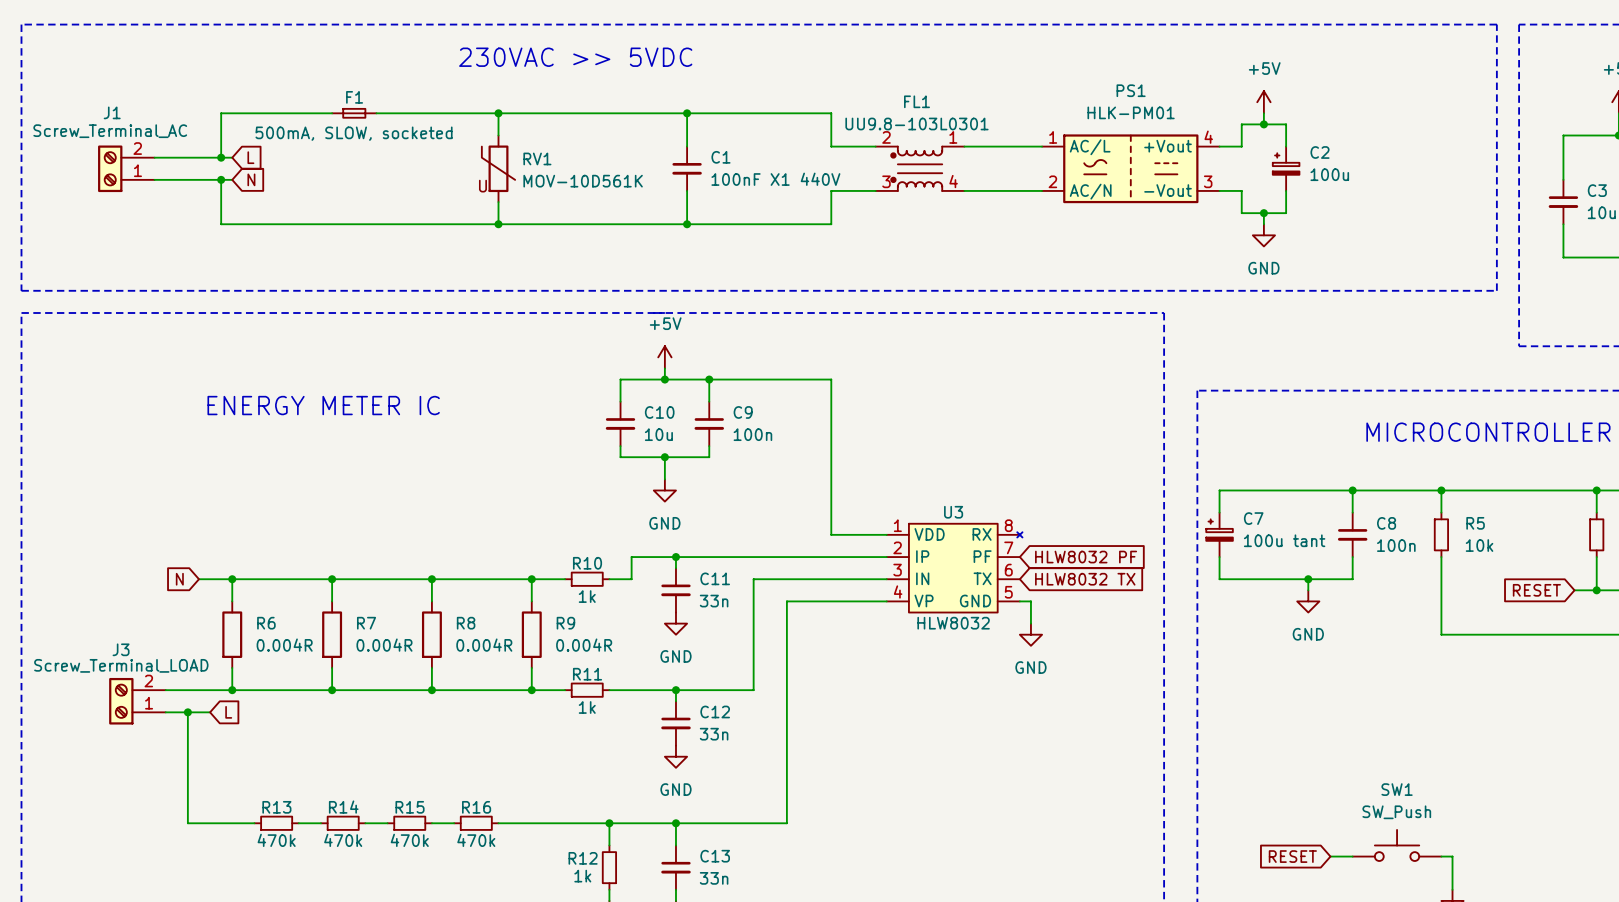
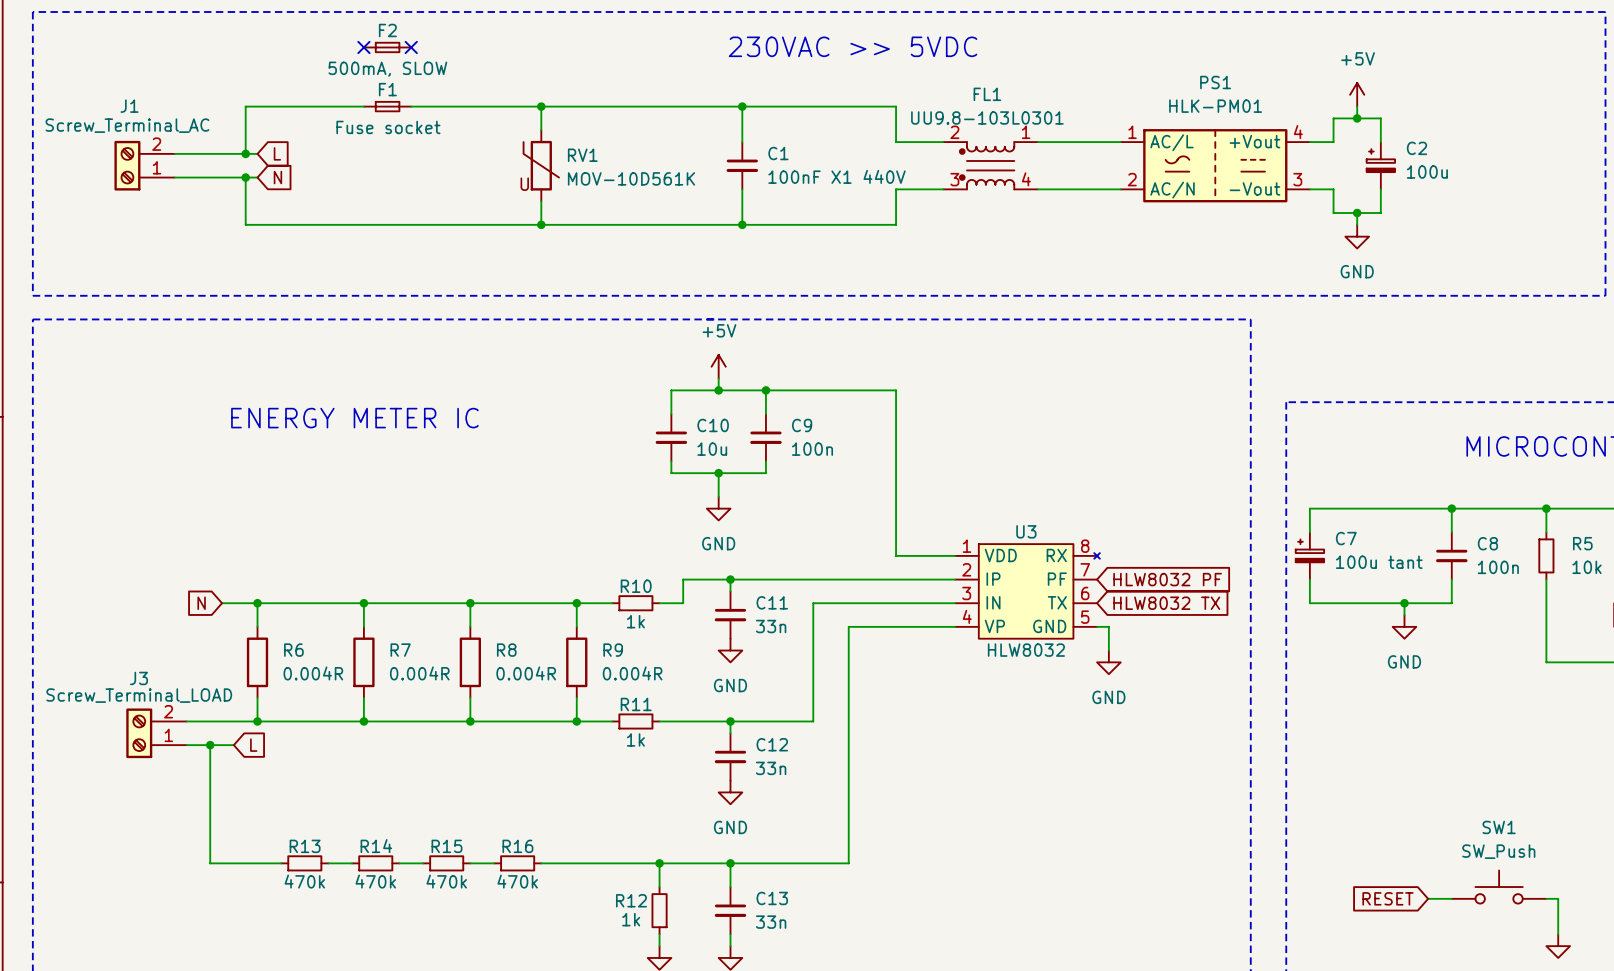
no-connect mark: none -> (363, 47)
F2: none -> 500mA, SLOW (387, 47)
no-connect mark: none -> (411, 47)
text position: 230VAC >> 5VDC (575, 57) -> 230VAC >> 5VDC (853, 46)
F1 value: 500mA, SLOW, socketed (354, 133) -> Fuse socket (388, 127)

